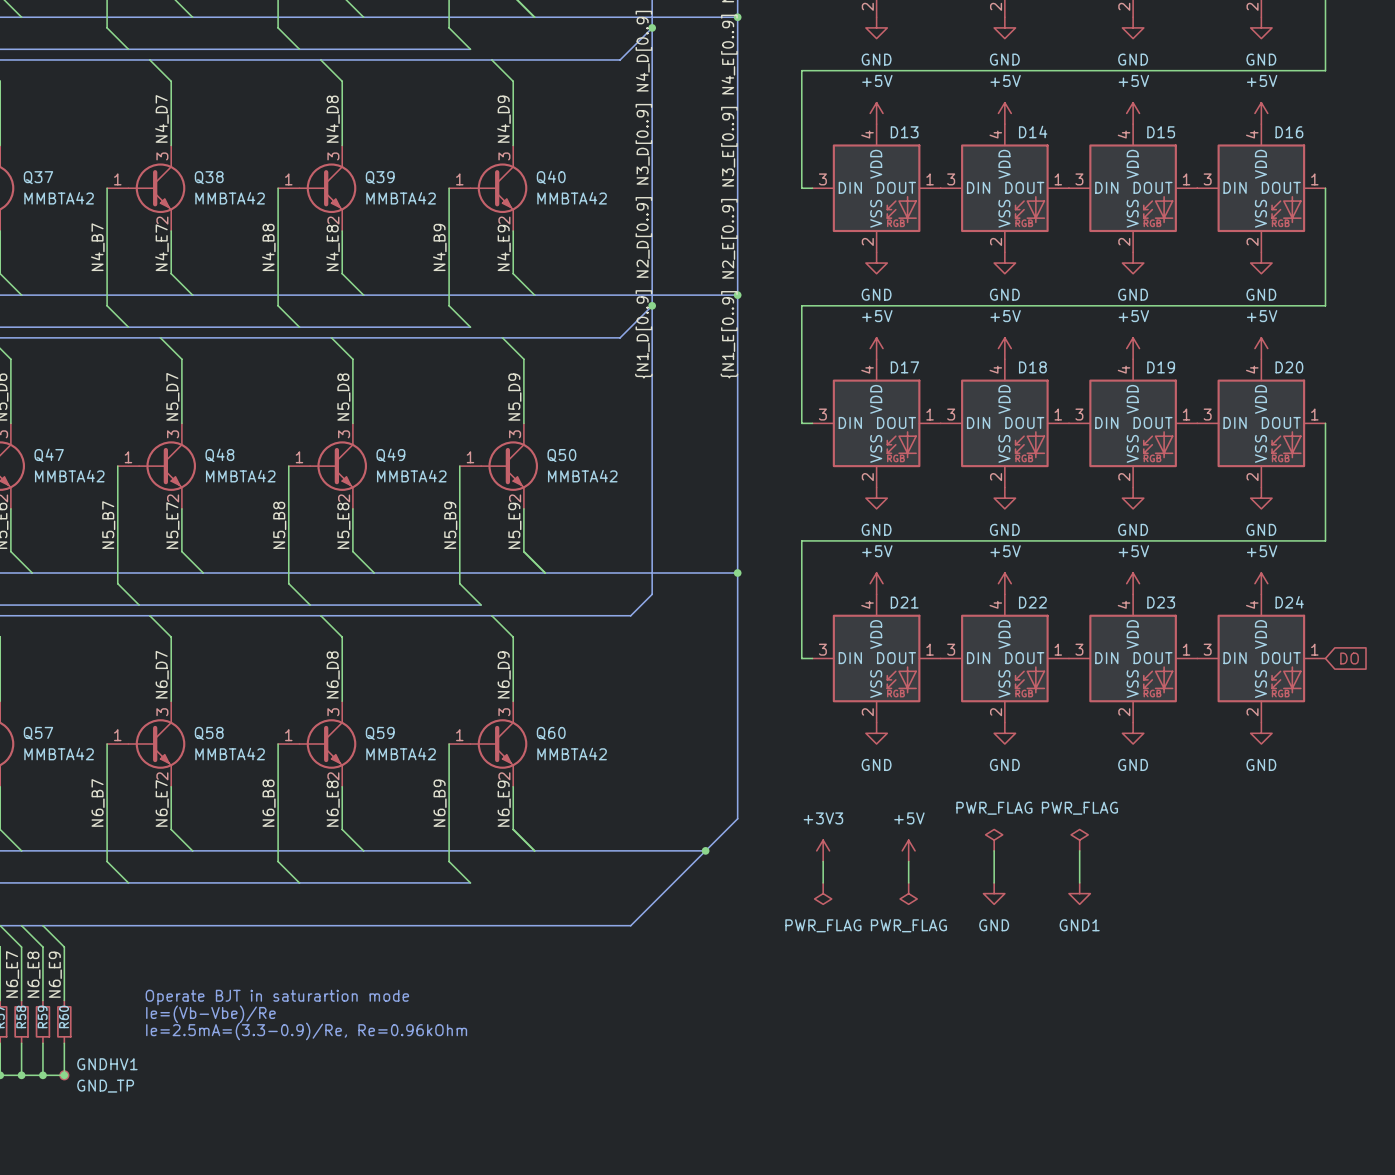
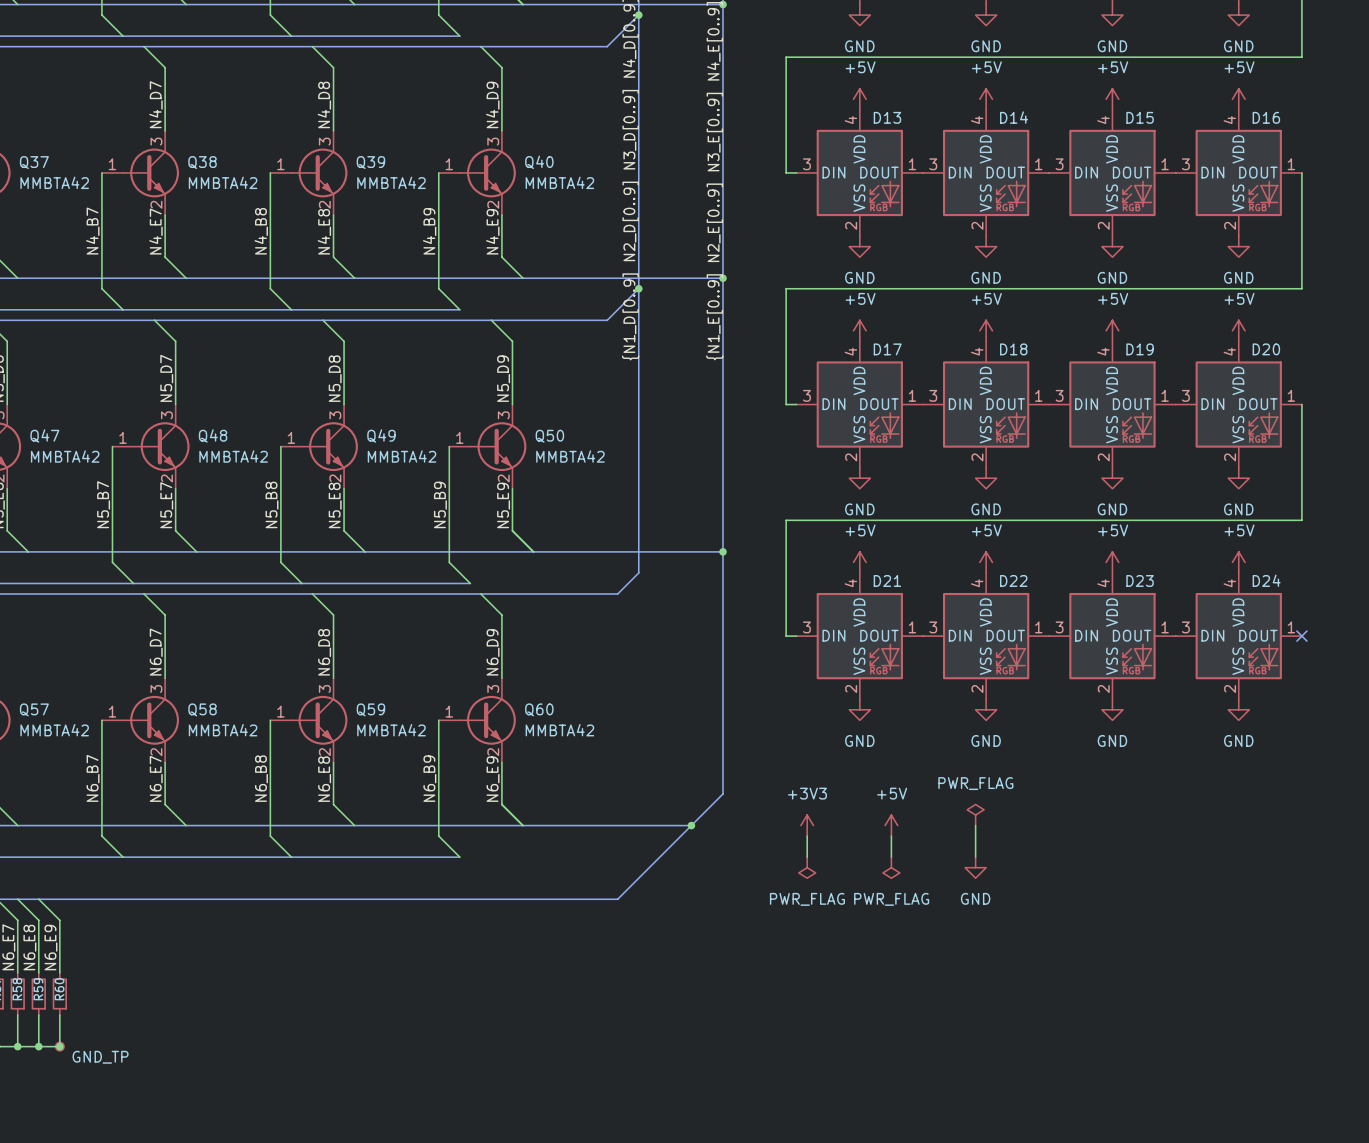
no-connect mark: none -> (1301, 636)
global label: DO (1349, 658) -> none
power symbol: PWR_FLAG (1079, 840) -> none
wire: (1079, 850) (1079, 882) -> none
power symbol: GND1 (1079, 893) -> none
text: Operate BJT in saturartion mode (277, 997) -> none
text: Ie=(Vb-Vbe)/Re (210, 1014) -> none
text: Ie=2.5mA=(3.3-0.9)/Re, Re=0.96kOhm (306, 1031) -> none
GNDHV1 name: GNDHV1 (107, 1064) -> none

